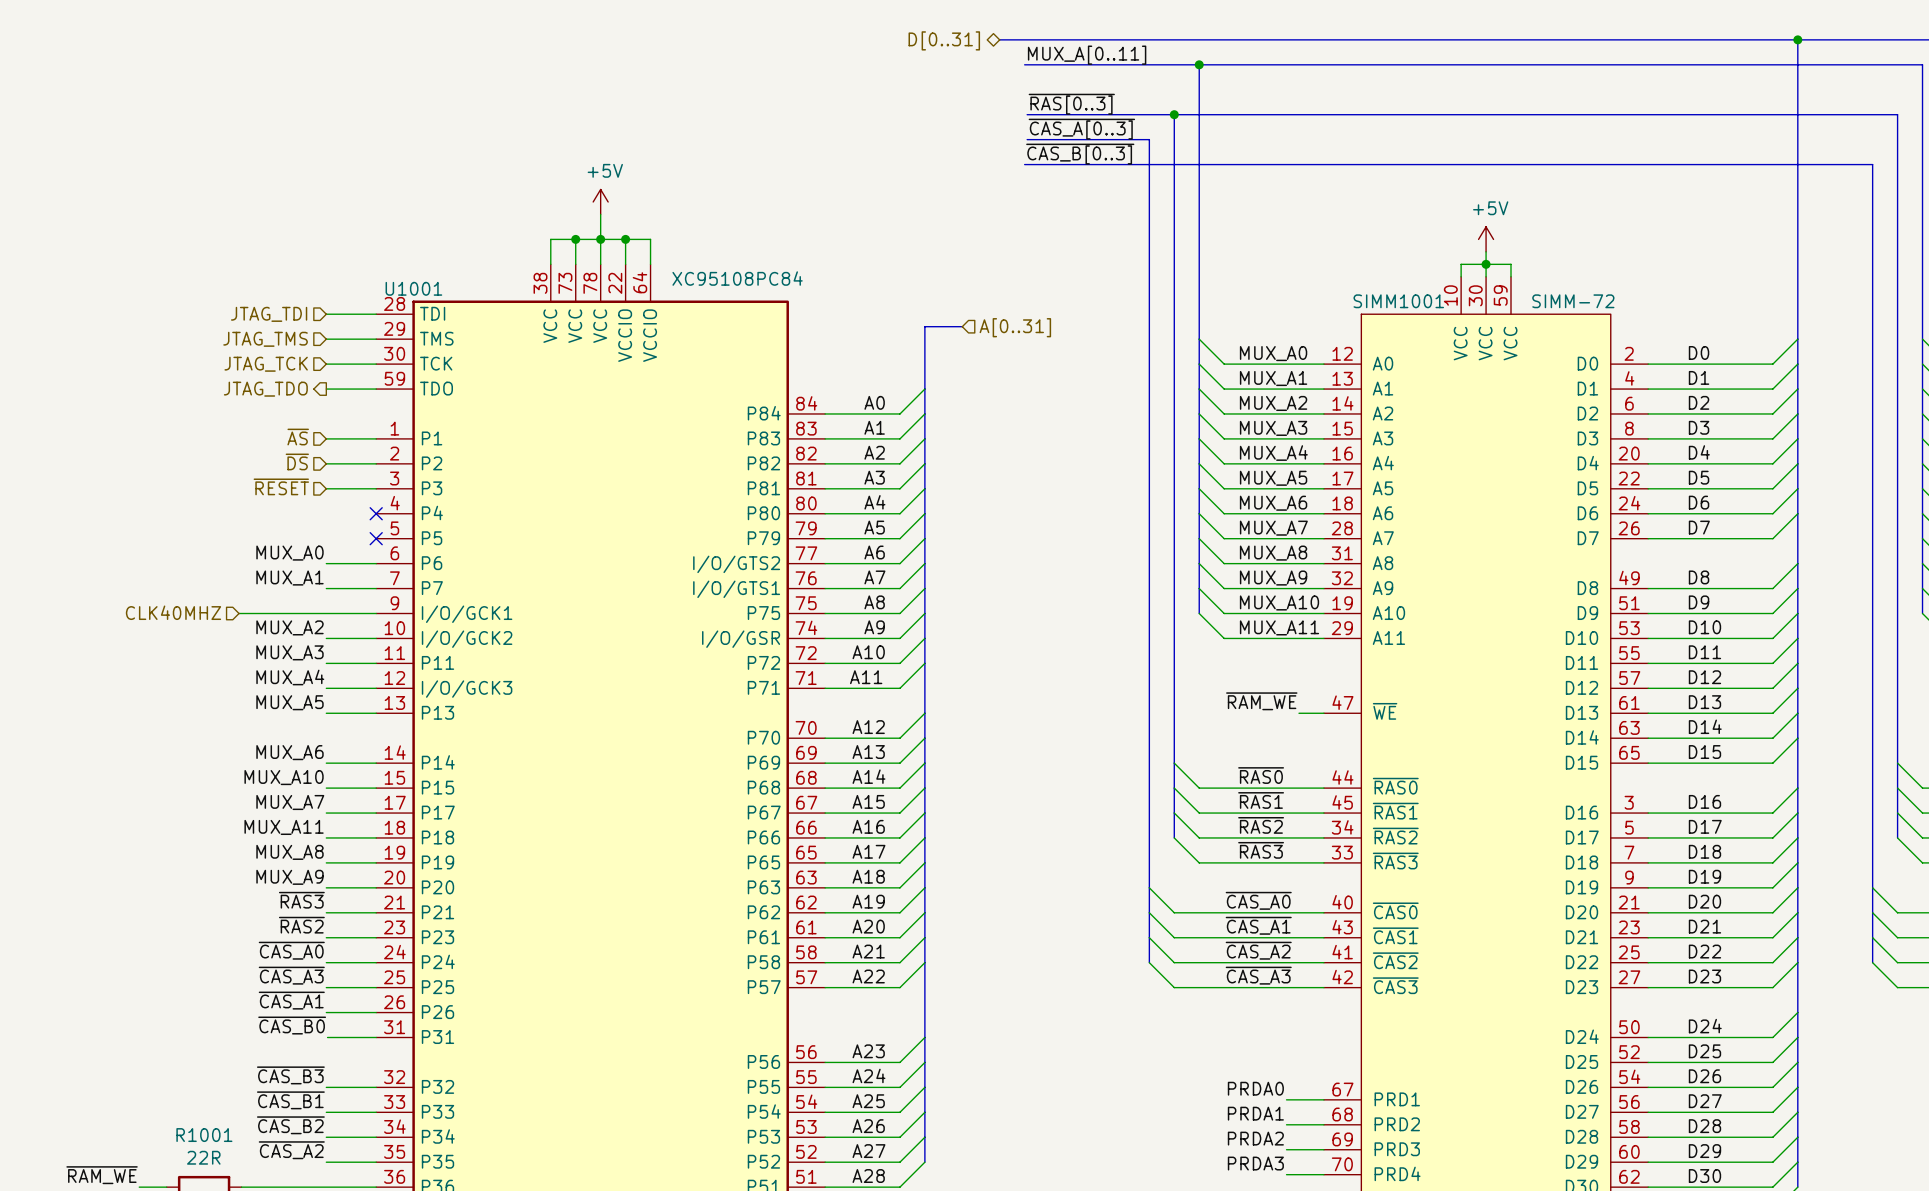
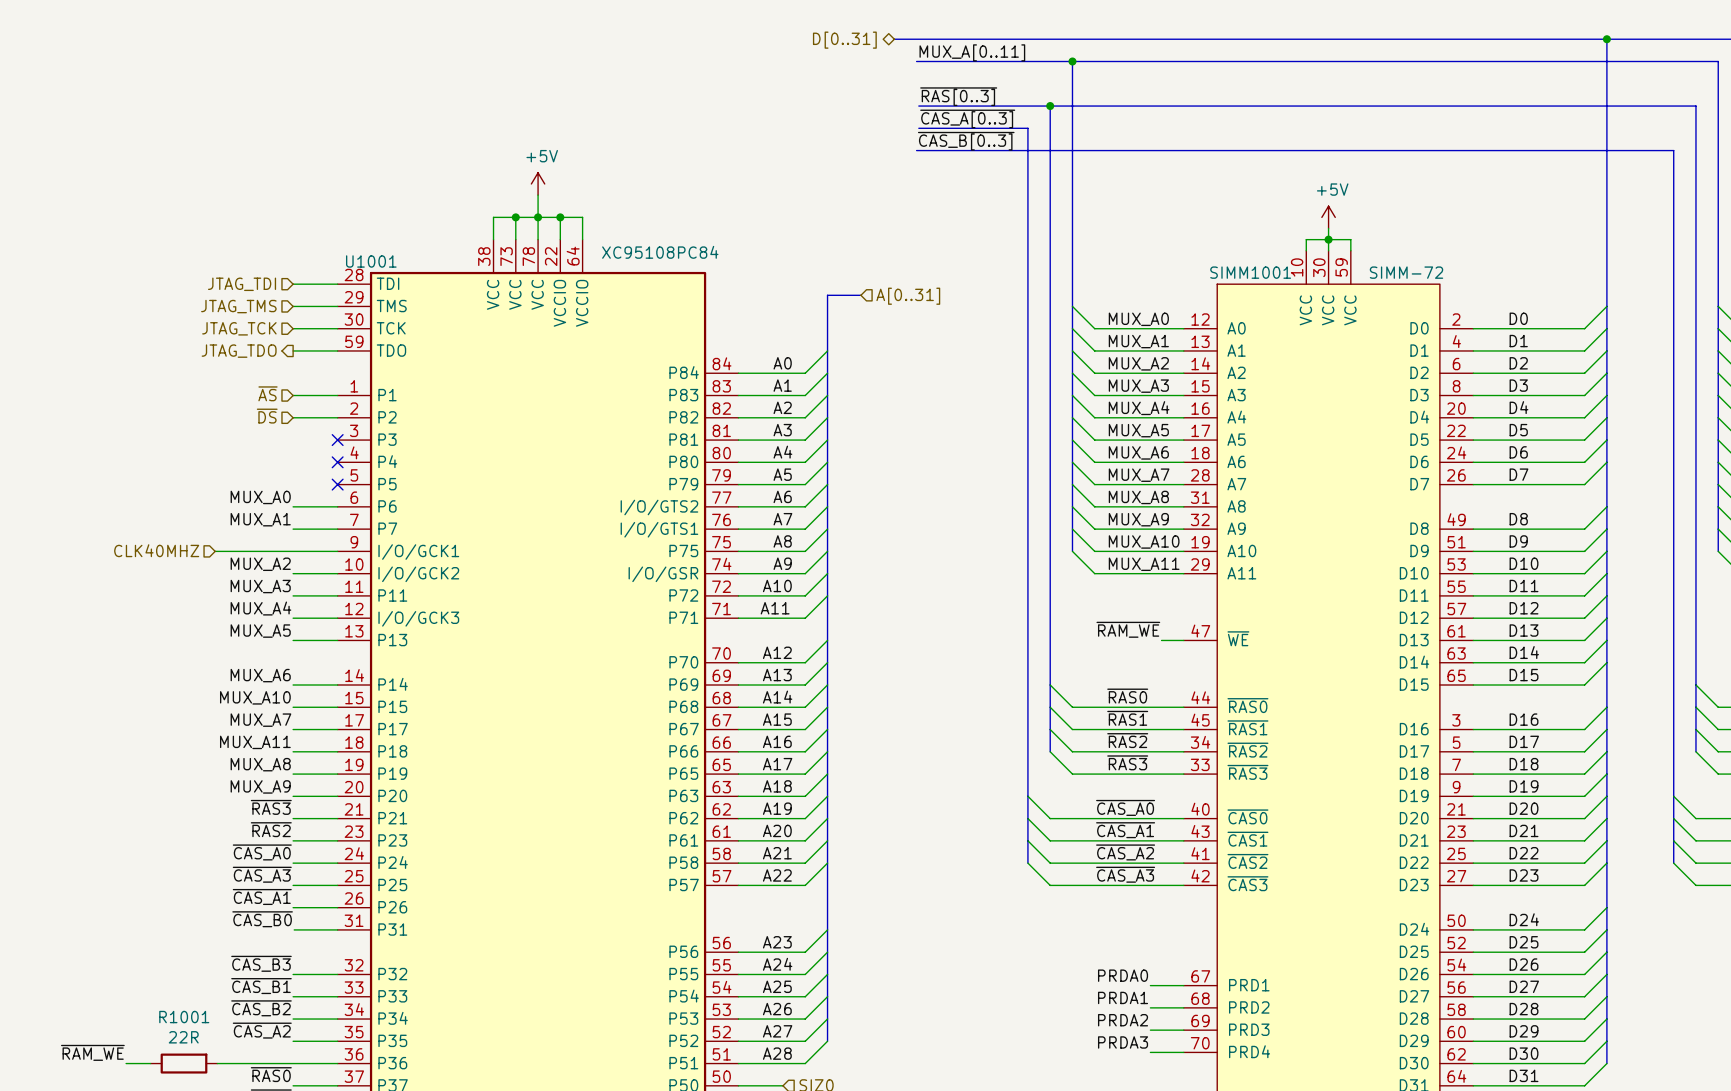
hierarchical label: ~{RESET} (281, 486) -> none
wire: (326, 488) (376, 488) -> none
no-connect mark: none -> (337, 440)

